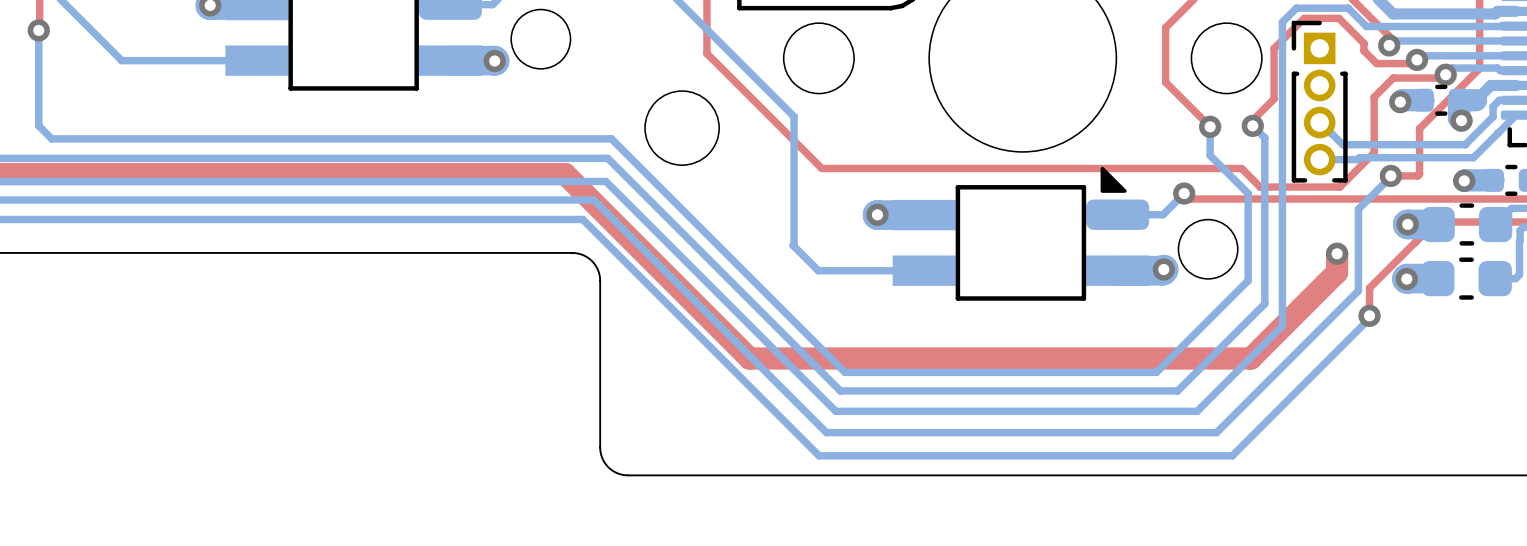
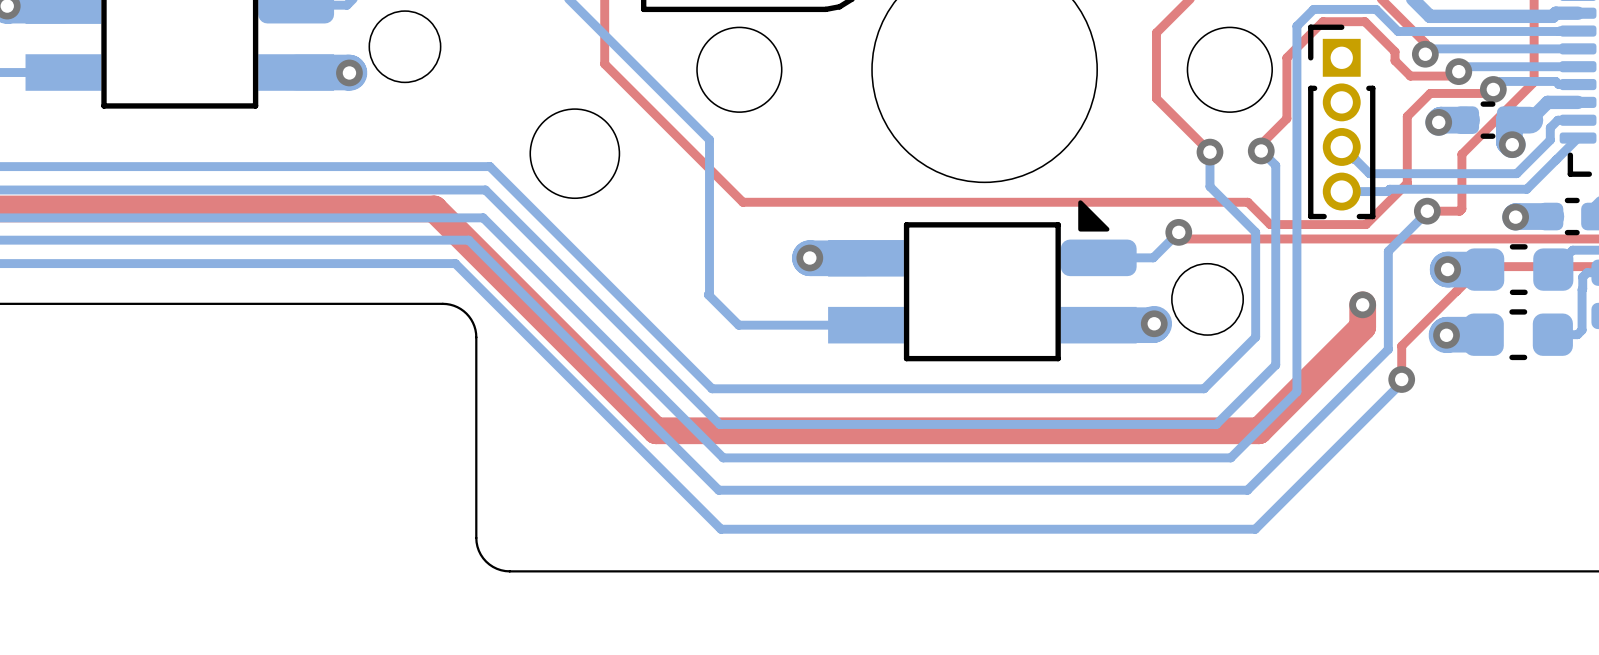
bottom track: (1205, 323) (1156, 372) (845, 372) (796, 323) -> (1204, 388) (712, 388)
bottom track: (1215, 353) (1177, 390) (840, 390) (802, 353) -> (1216, 424) (719, 424)
bottom track: (1227, 381) (1197, 411) (835, 411) (805, 381) -> (1230, 457) (723, 457)
bottom track: (1241, 407) (1216, 432) (826, 432) (801, 407) -> (1247, 490) (718, 490)
bottom track: (1247, 440) (1232, 455) (819, 455) (803, 440) -> (1255, 529) (721, 529)

